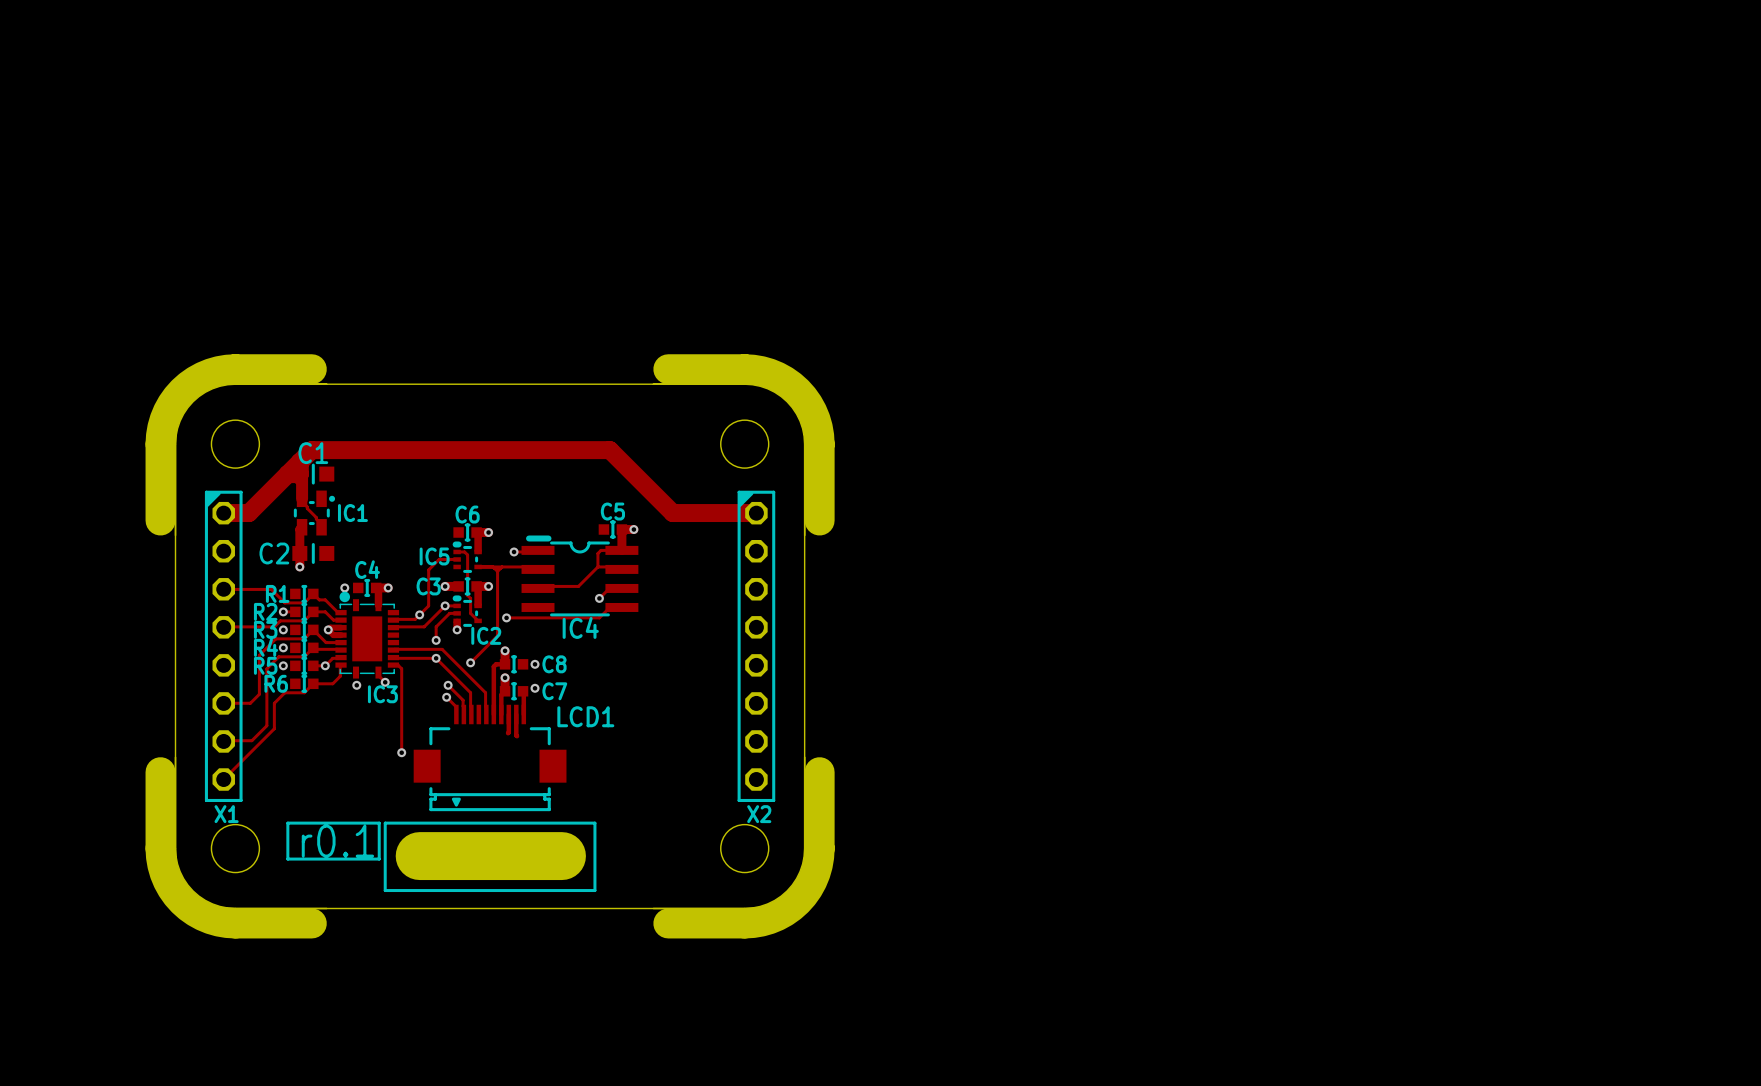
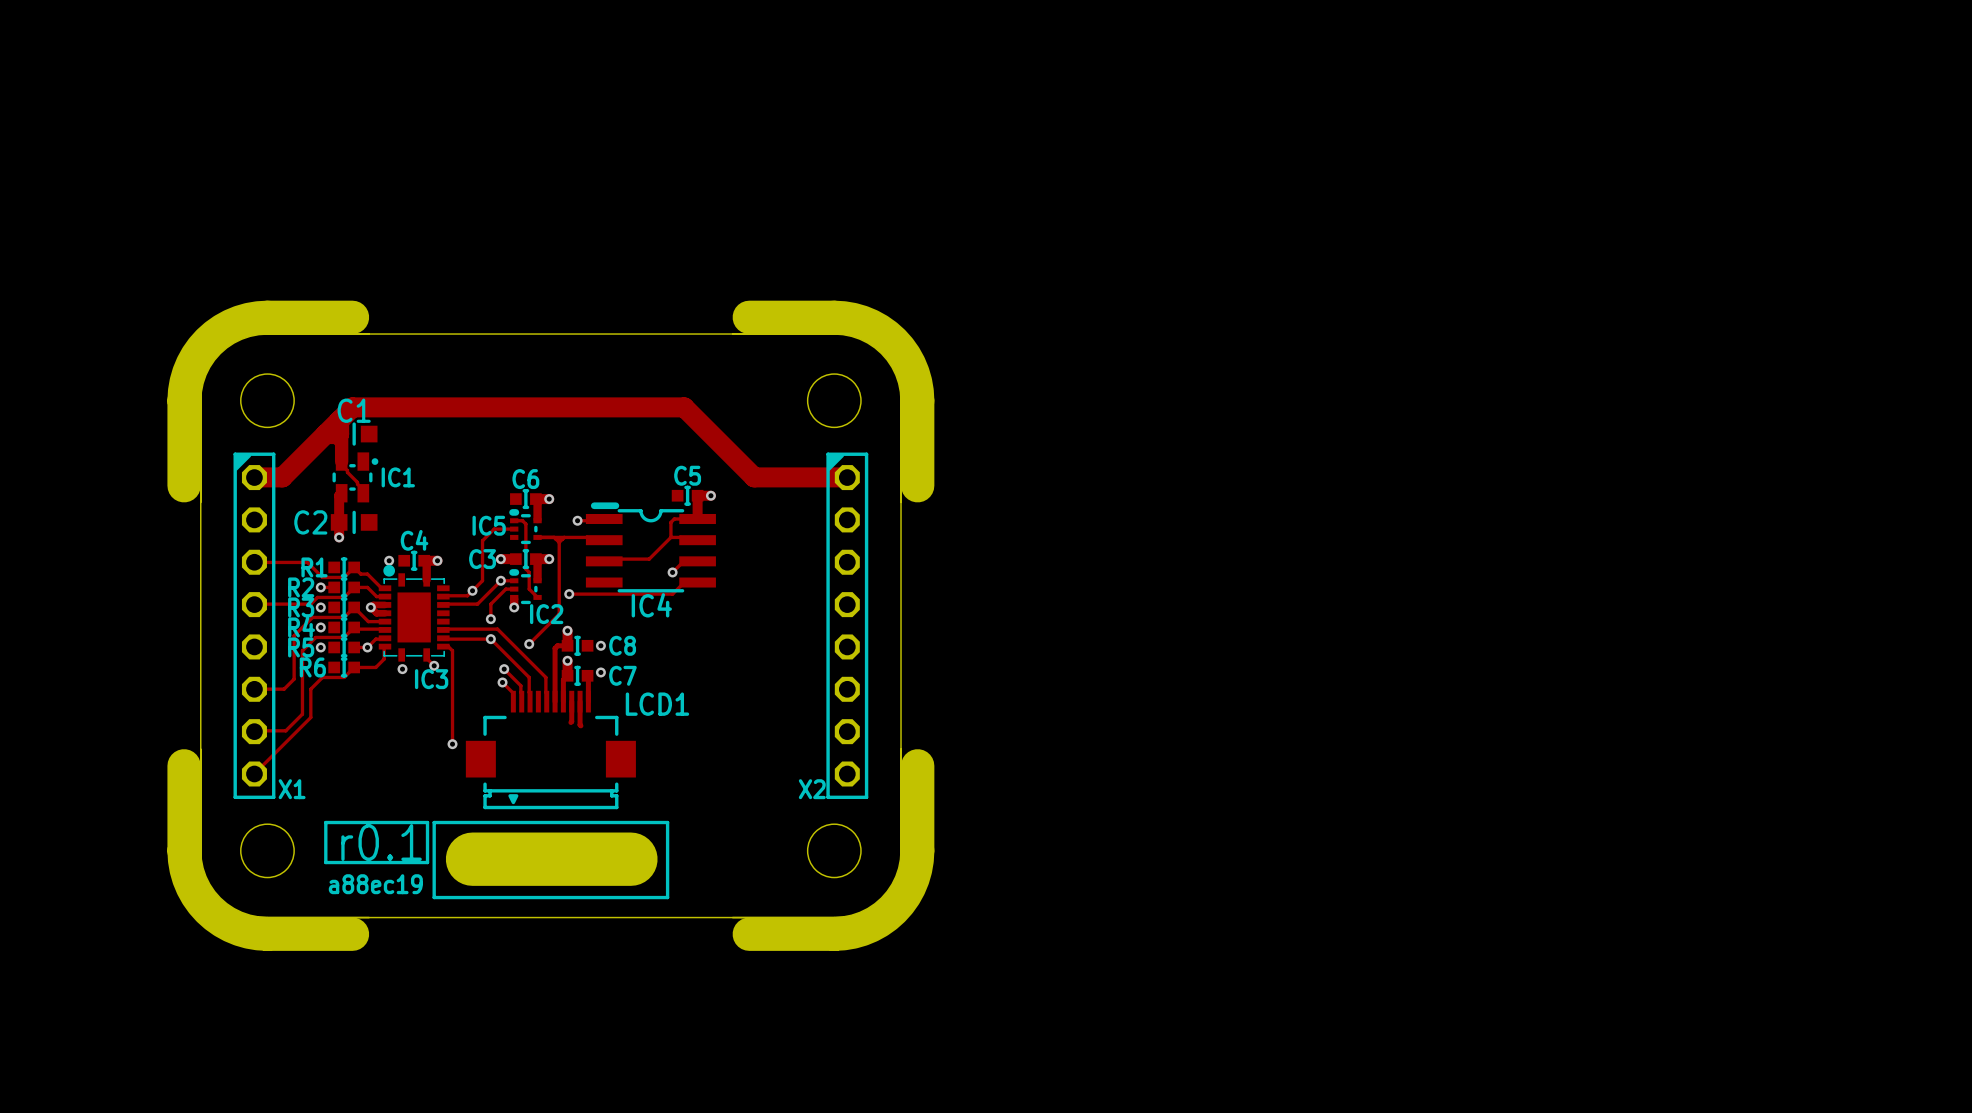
X1 name position: X1 (226, 814) -> X1 (292, 789)
X2 name position: X2 (759, 814) -> X2 (812, 789)
drawing: none -> [328, 874, 423, 895]

